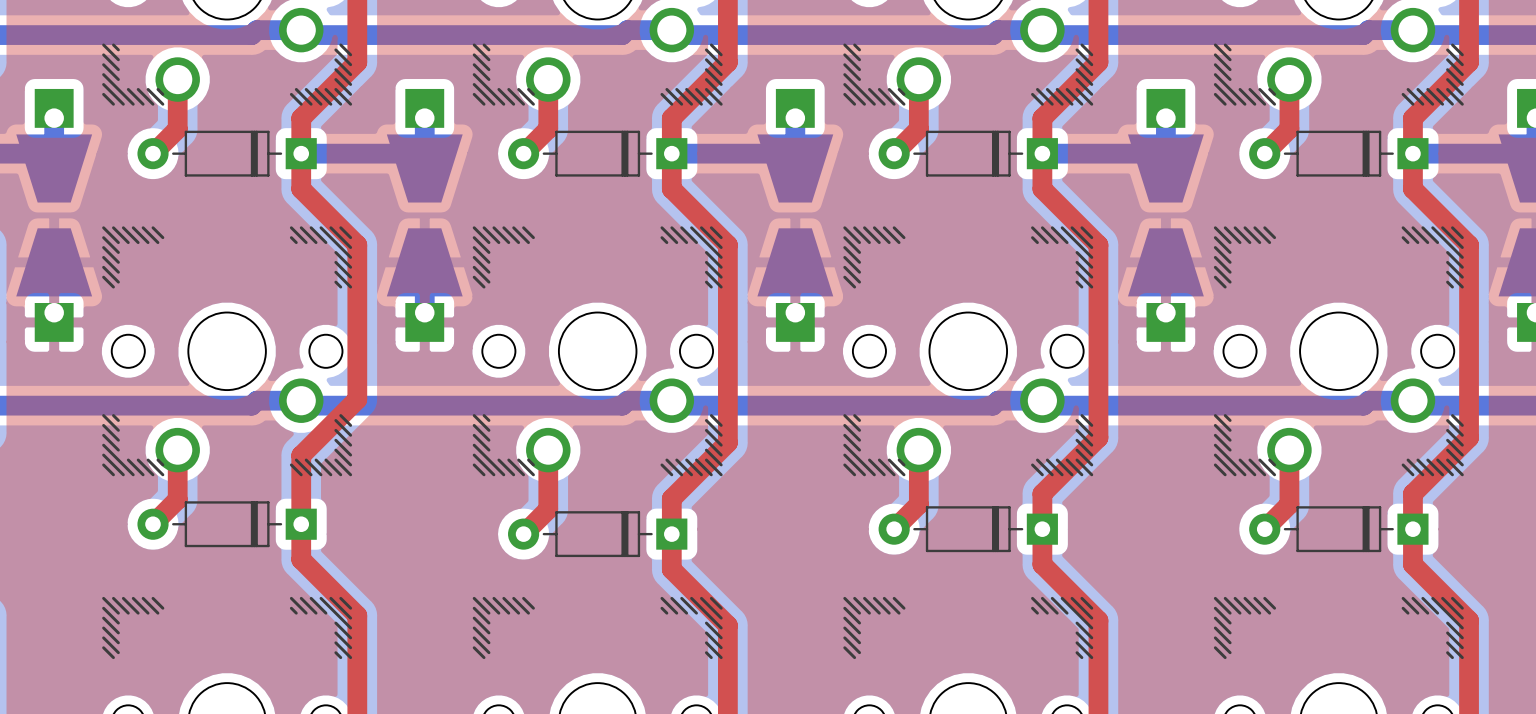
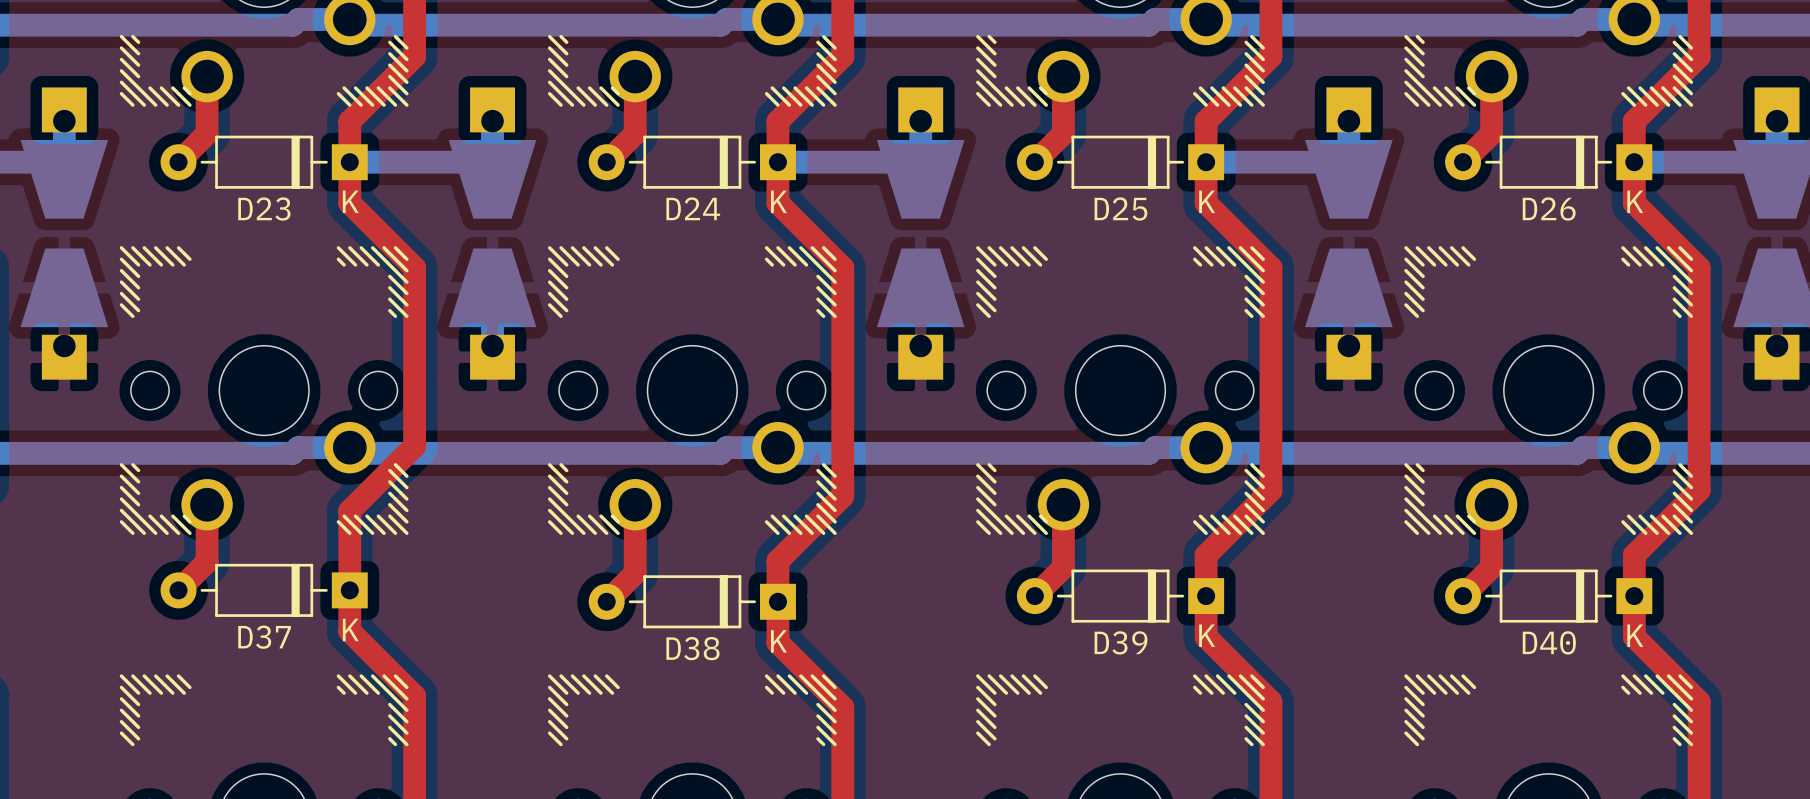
D23 text: none -> K (350, 201)
D24 text: none -> K (778, 201)
D25 text: none -> K (1207, 201)
D26 text: none -> K (1635, 201)
D24 name: none -> D24 (693, 208)
D23 name: none -> D23 (264, 209)
D25 name: none -> D25 (1120, 209)
D26 name: none -> D26 (1549, 209)
D37 text: none -> K (350, 629)
D39 text: none -> K (1207, 635)
D40 text: none -> K (1635, 635)
D37 name: none -> D37 (264, 637)
D38 text: none -> K (778, 641)
D39 name: none -> D39 (1121, 642)
D40 name: none -> D40 (1549, 642)
D38 name: none -> D38 (692, 648)

